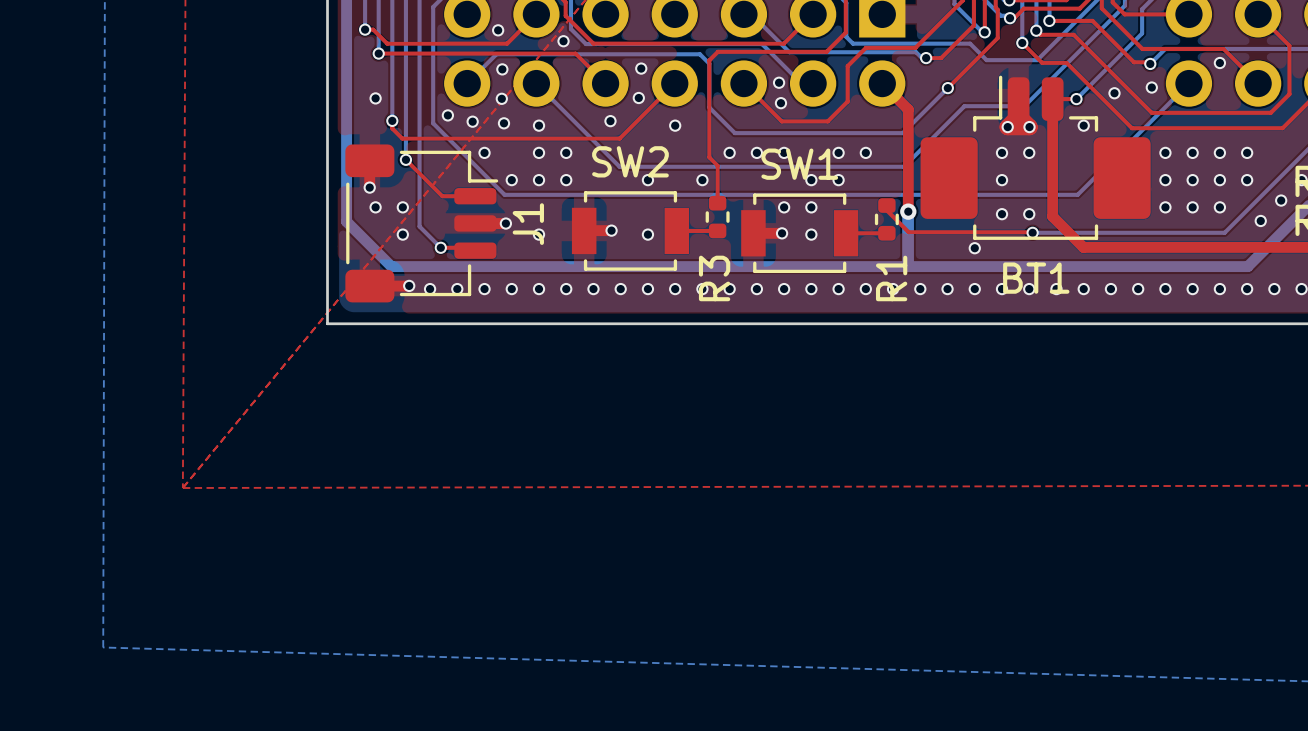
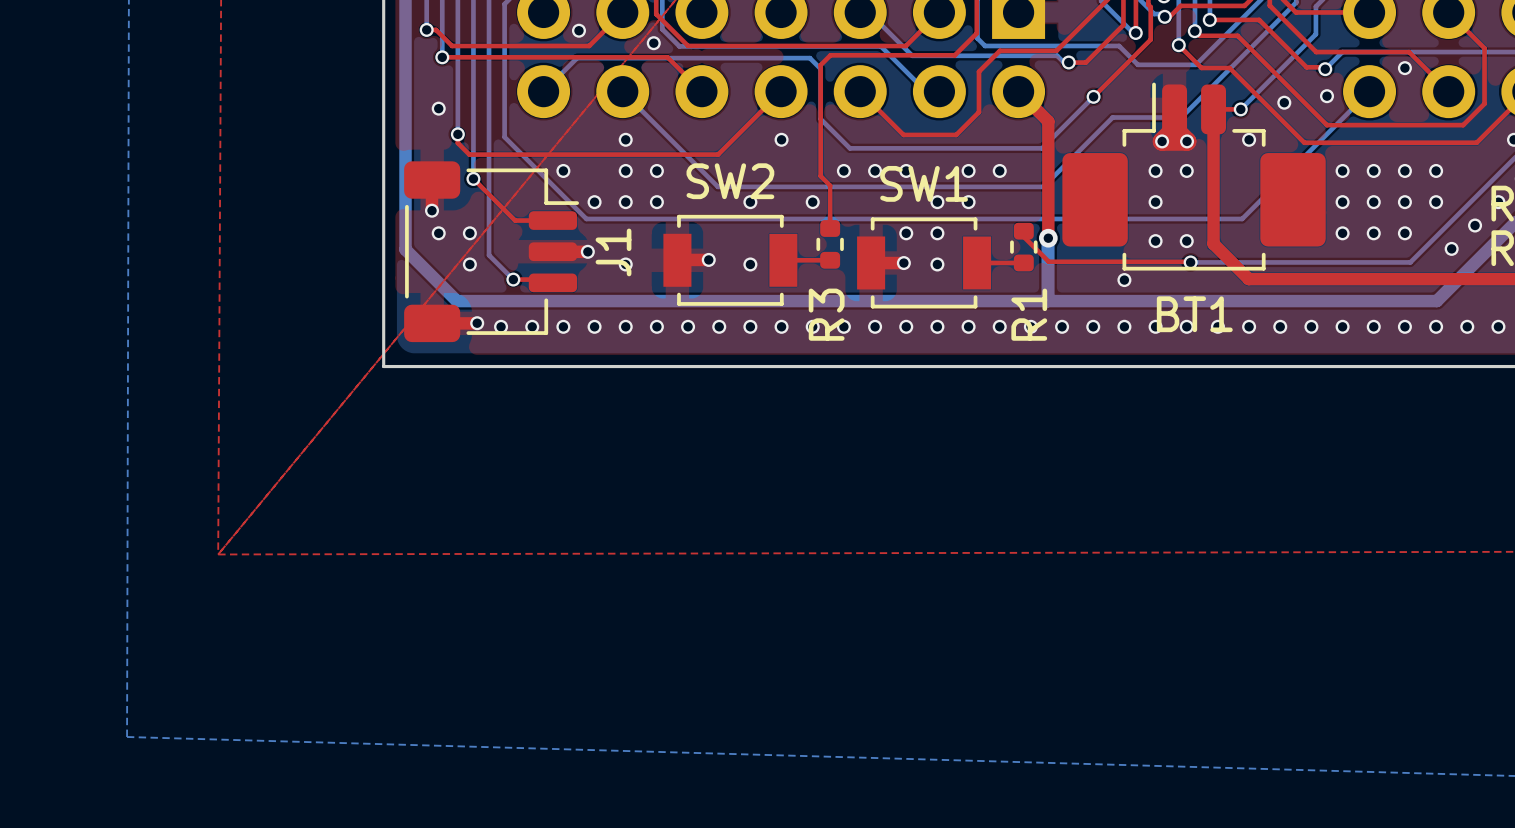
via: (641, 68) -> none
via: (502, 69) -> none
via: (779, 82) -> none
via: (638, 97) -> none
via: (501, 98) -> none
via: (780, 103) -> none
via: (447, 115) -> none
via: (472, 121) -> none
via: (610, 121) -> none
via: (503, 123) -> none

